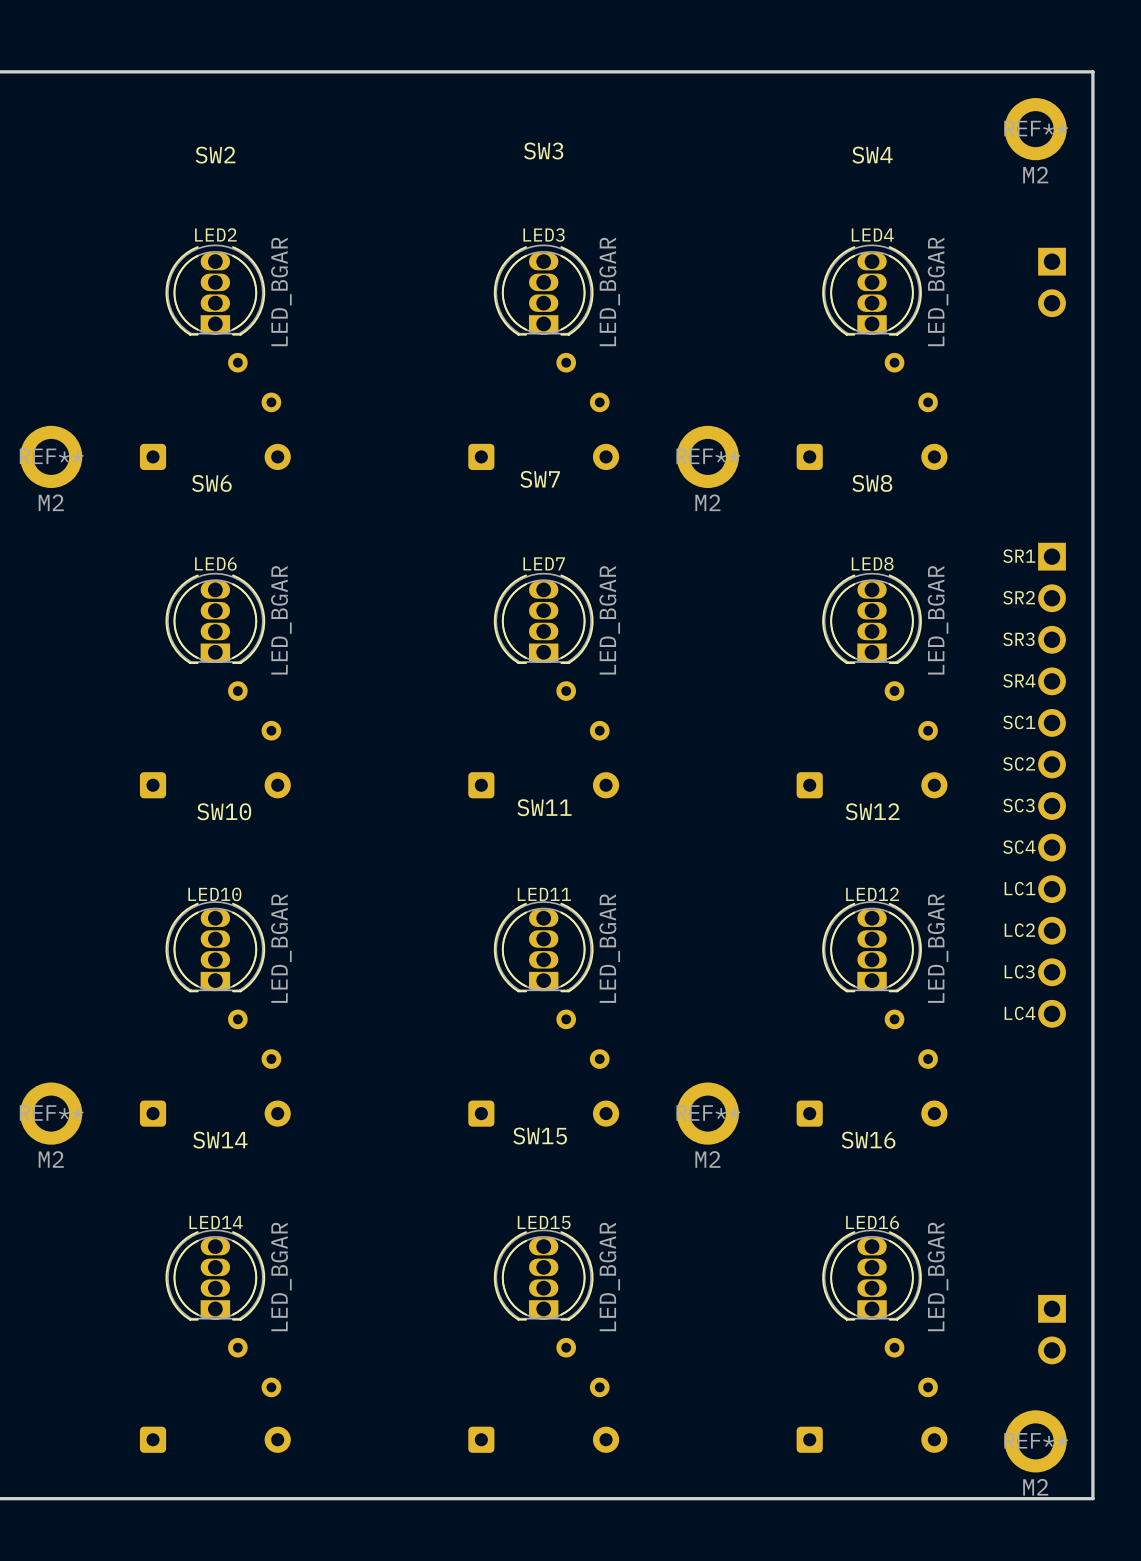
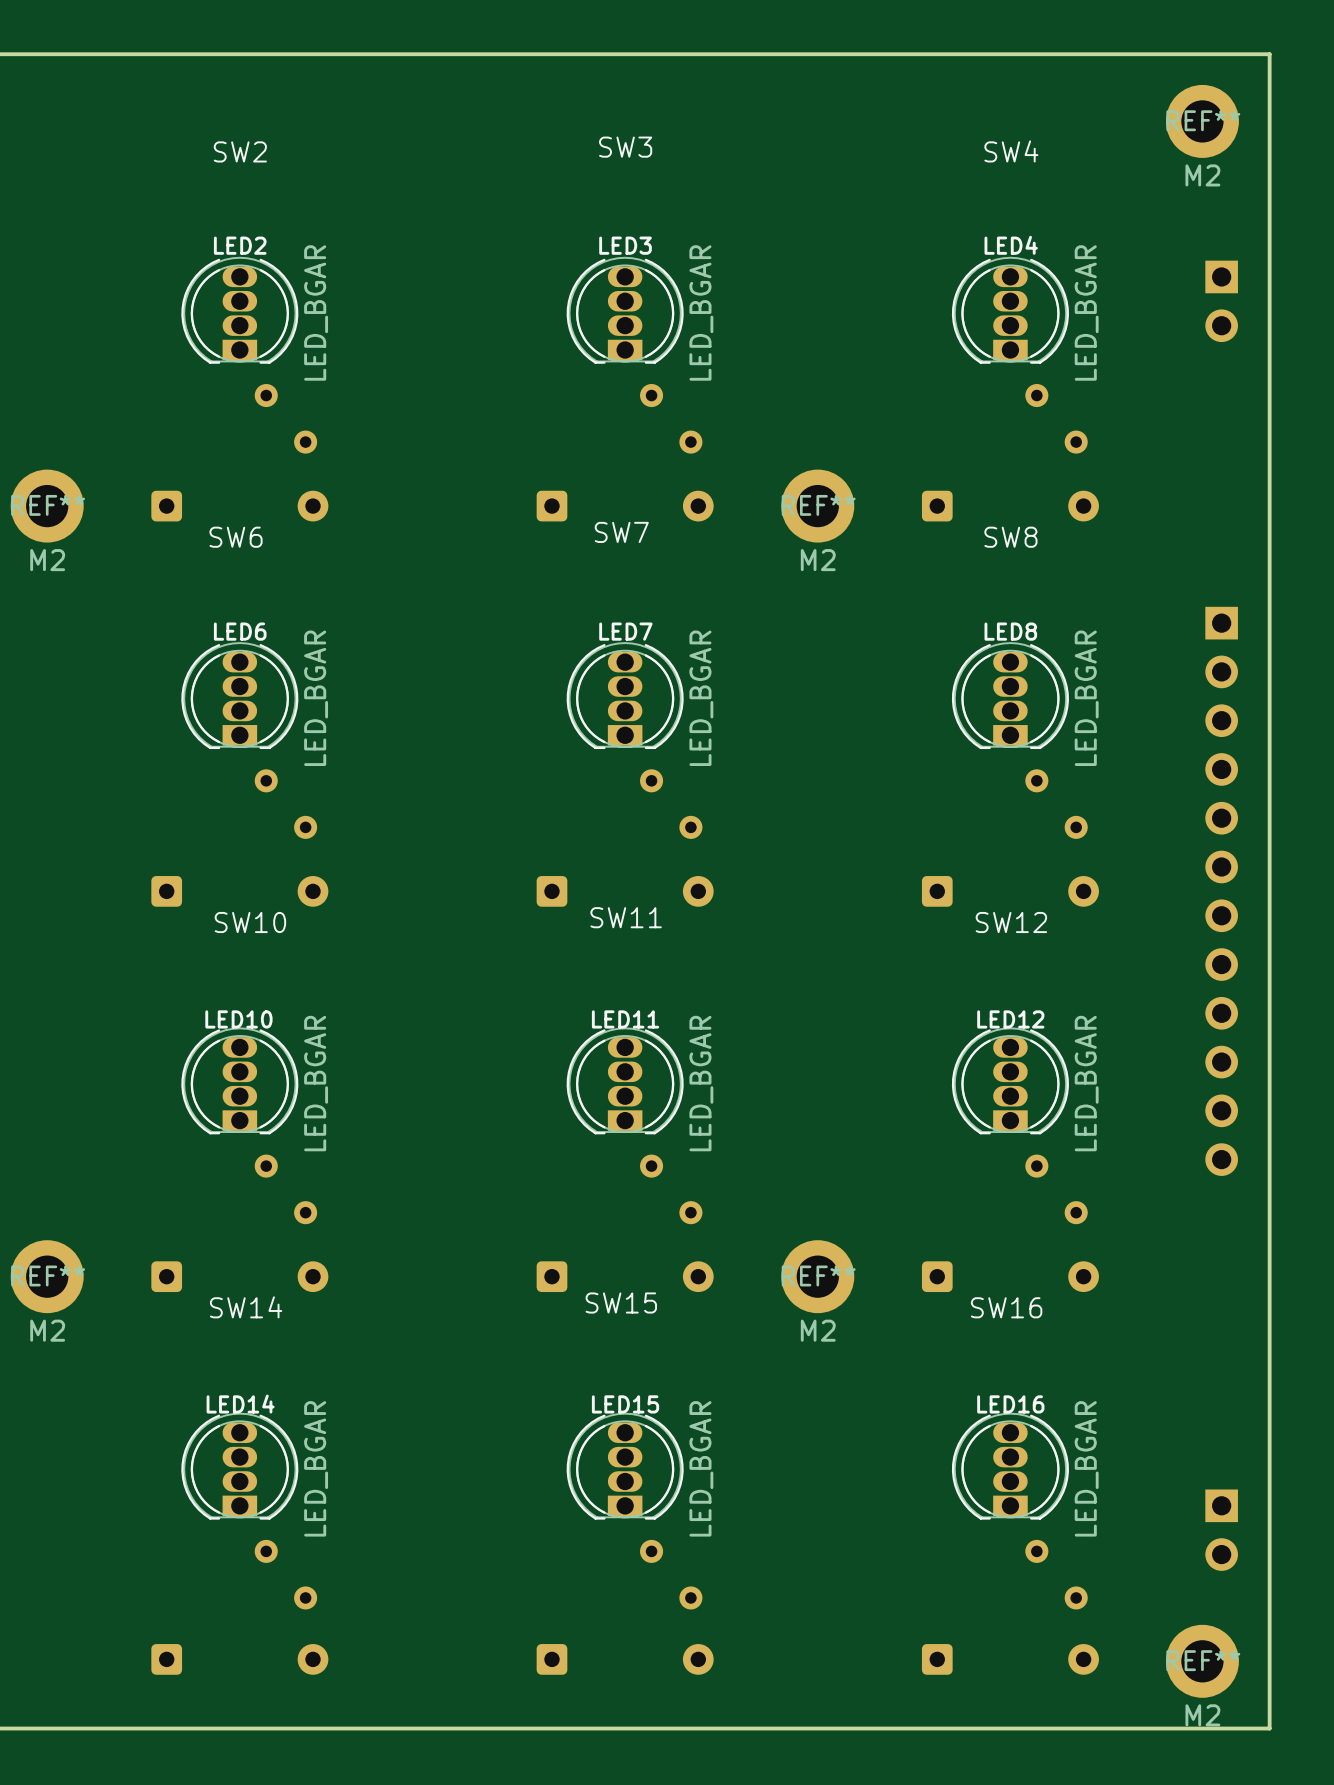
text: SR1 (1019, 556) -> none
text: SR2 (1019, 597) -> none
text: SR3 (1018, 639) -> none
text: SR4 (1019, 680) -> none
text: SC1 (1019, 722) -> none
text: SC2 (1019, 763) -> none
text: SC3 (1018, 805) -> none
text: SC4 (1019, 847) -> none
text: LC1 (1019, 888) -> none
text: LC2 (1019, 930) -> none
text: LC3 (1019, 971) -> none
text: LC4 (1020, 1013) -> none

